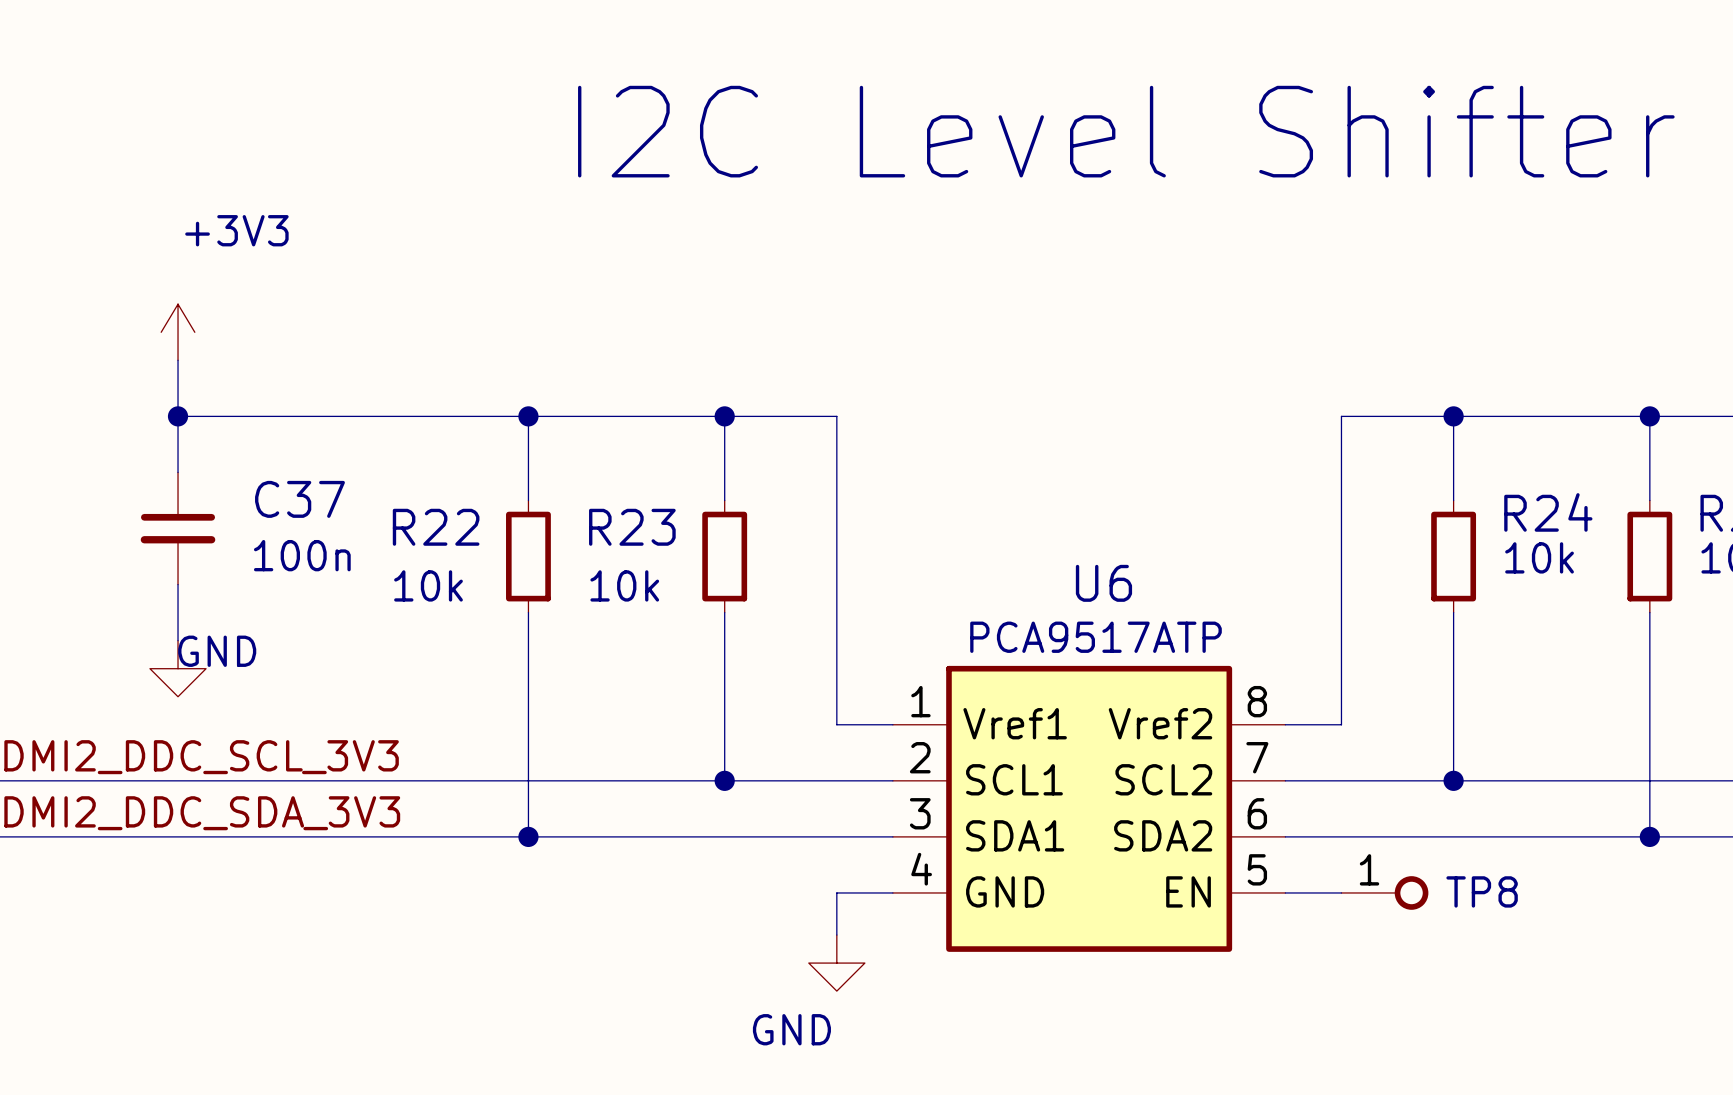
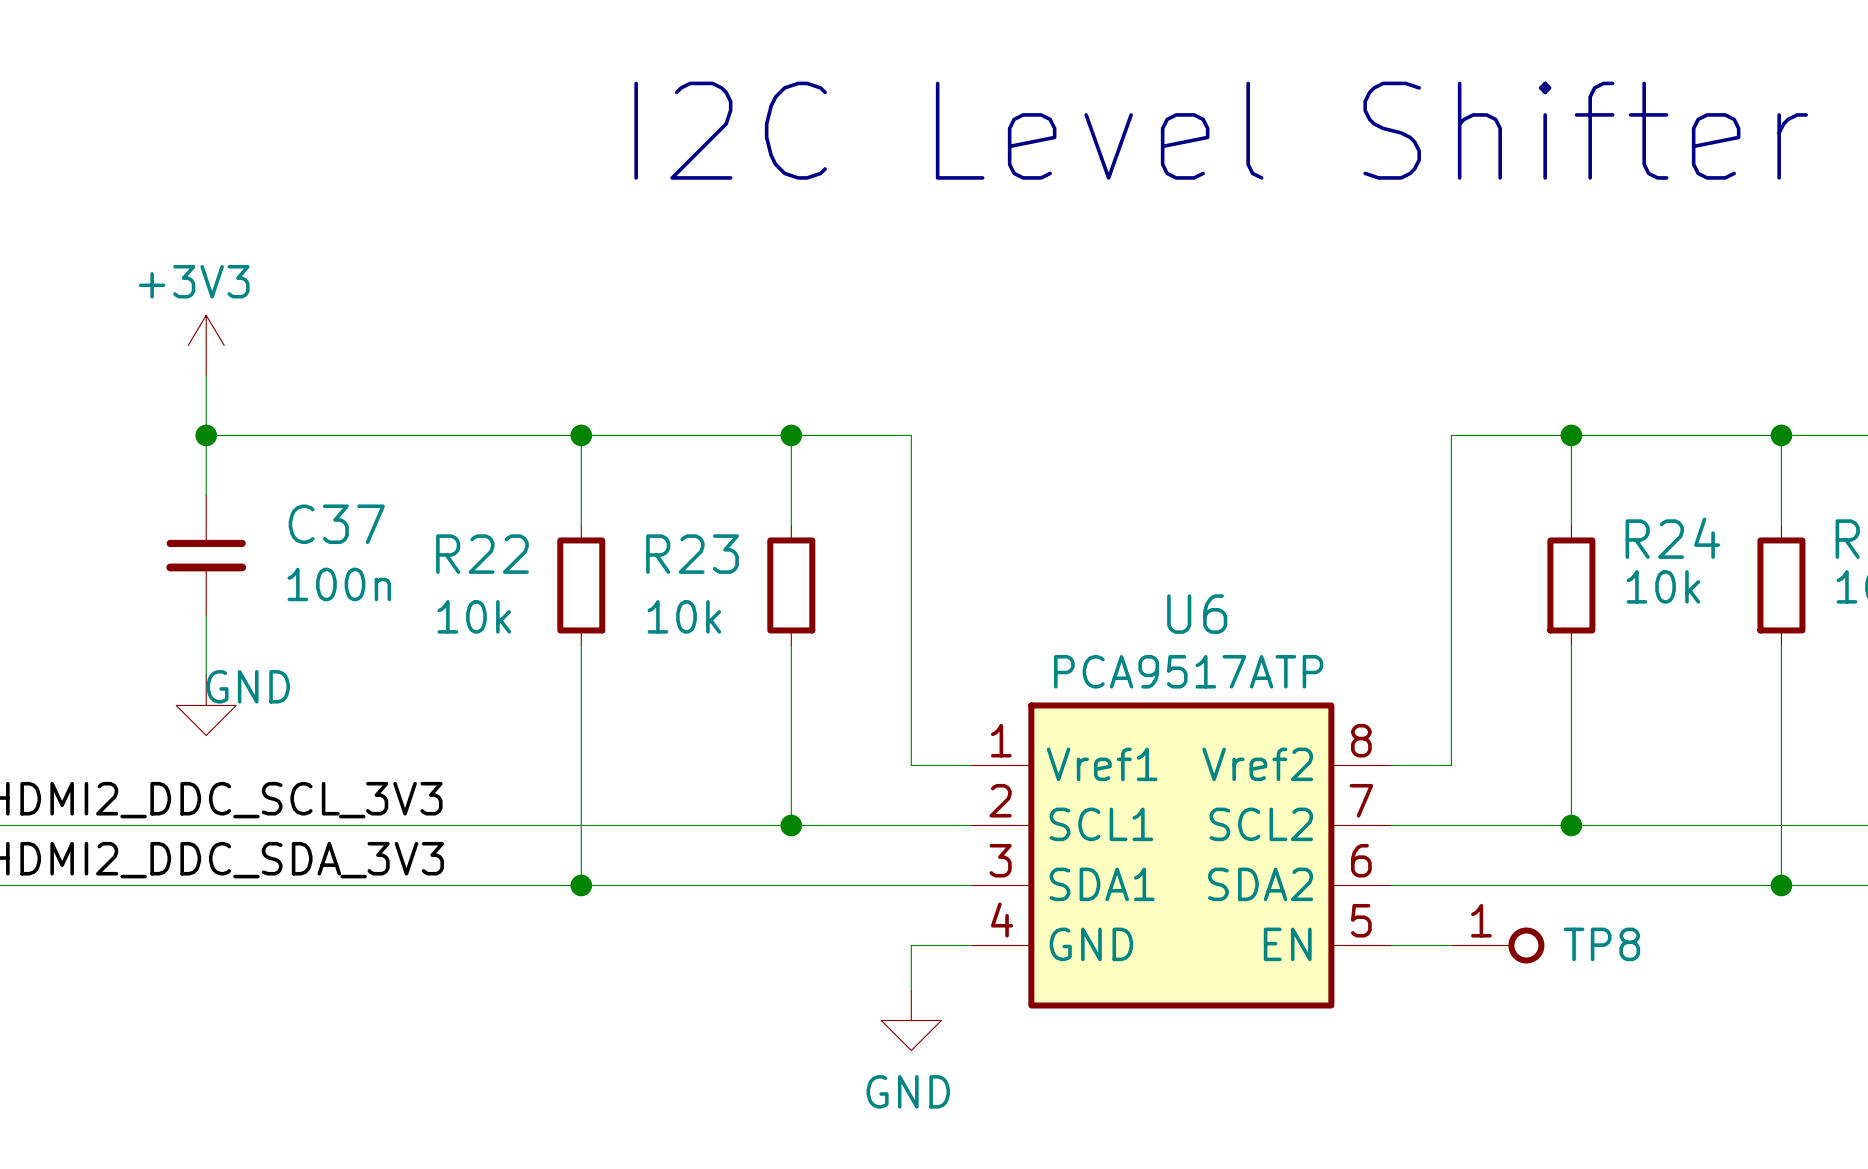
power symbol text position: +3V3 (236, 230) -> +3V3 (194, 281)
power symbol text position: GND (791, 1029) -> GND (908, 1091)

